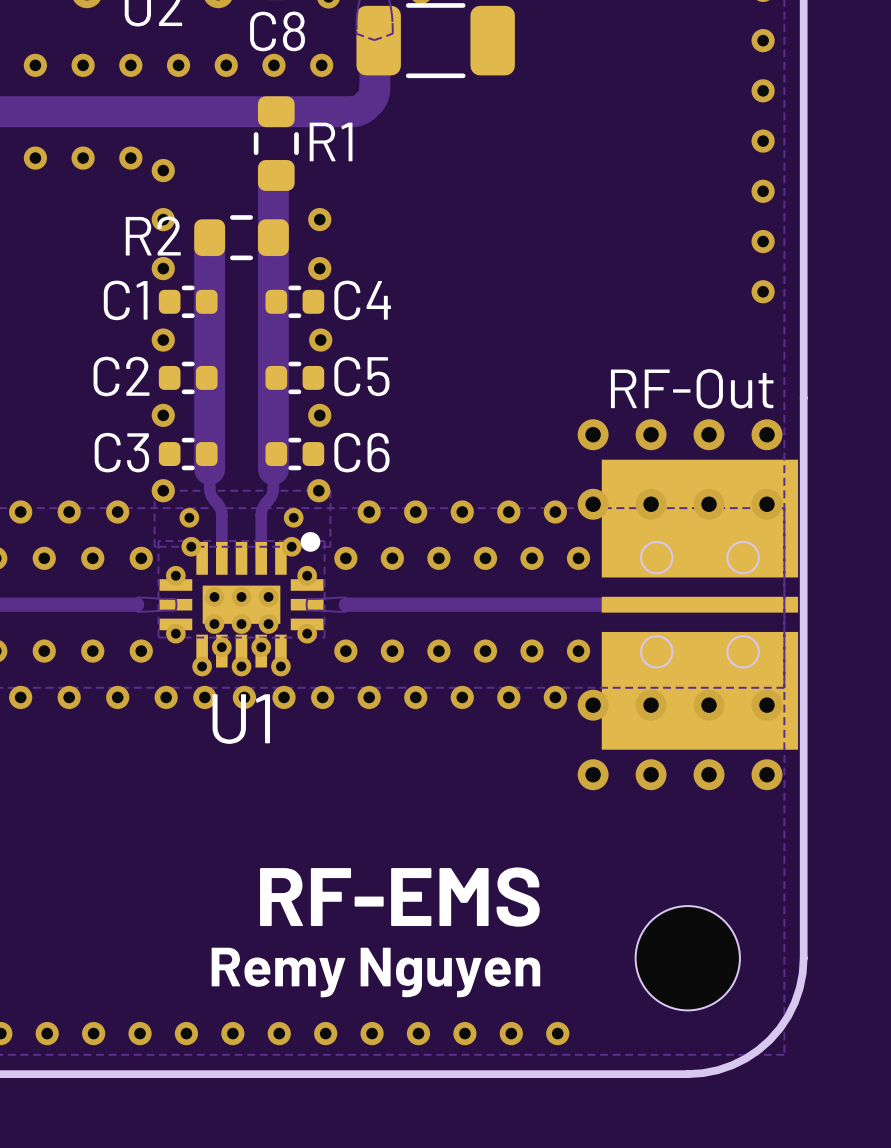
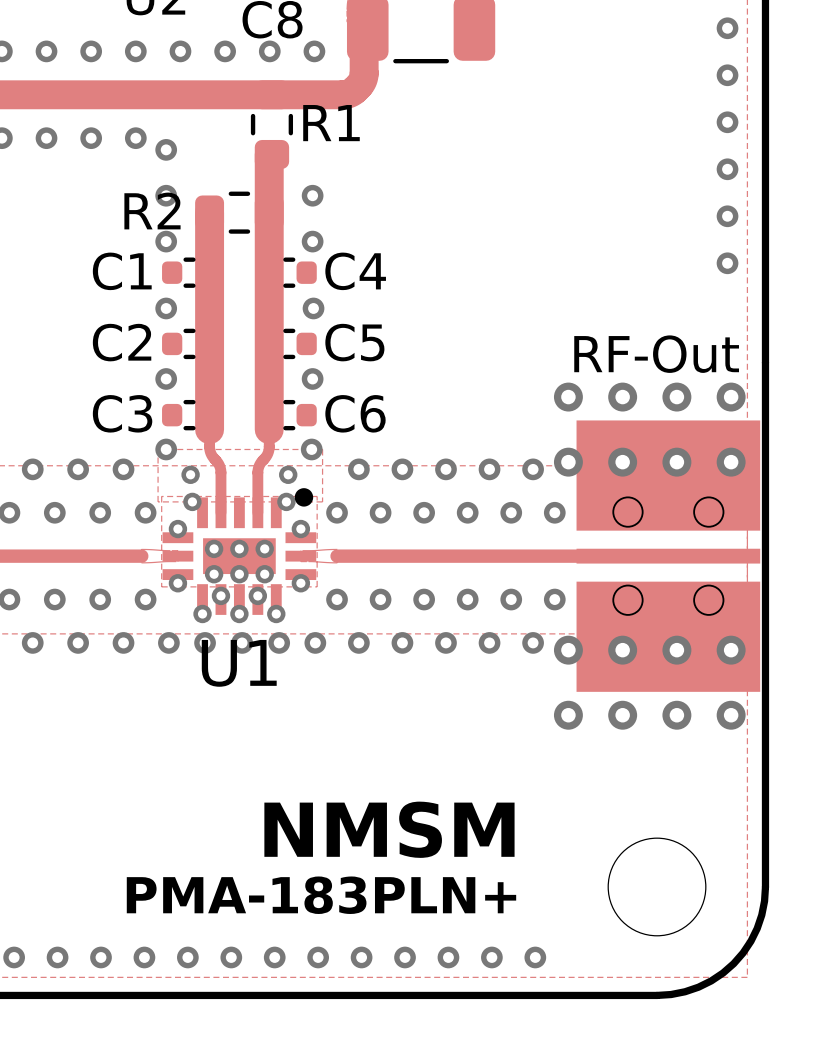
text: RF-EMS (399, 897) -> NMSM (389, 829)
text: Remy Nguyen (375, 972) -> PMA-183PLN+ (321, 895)

